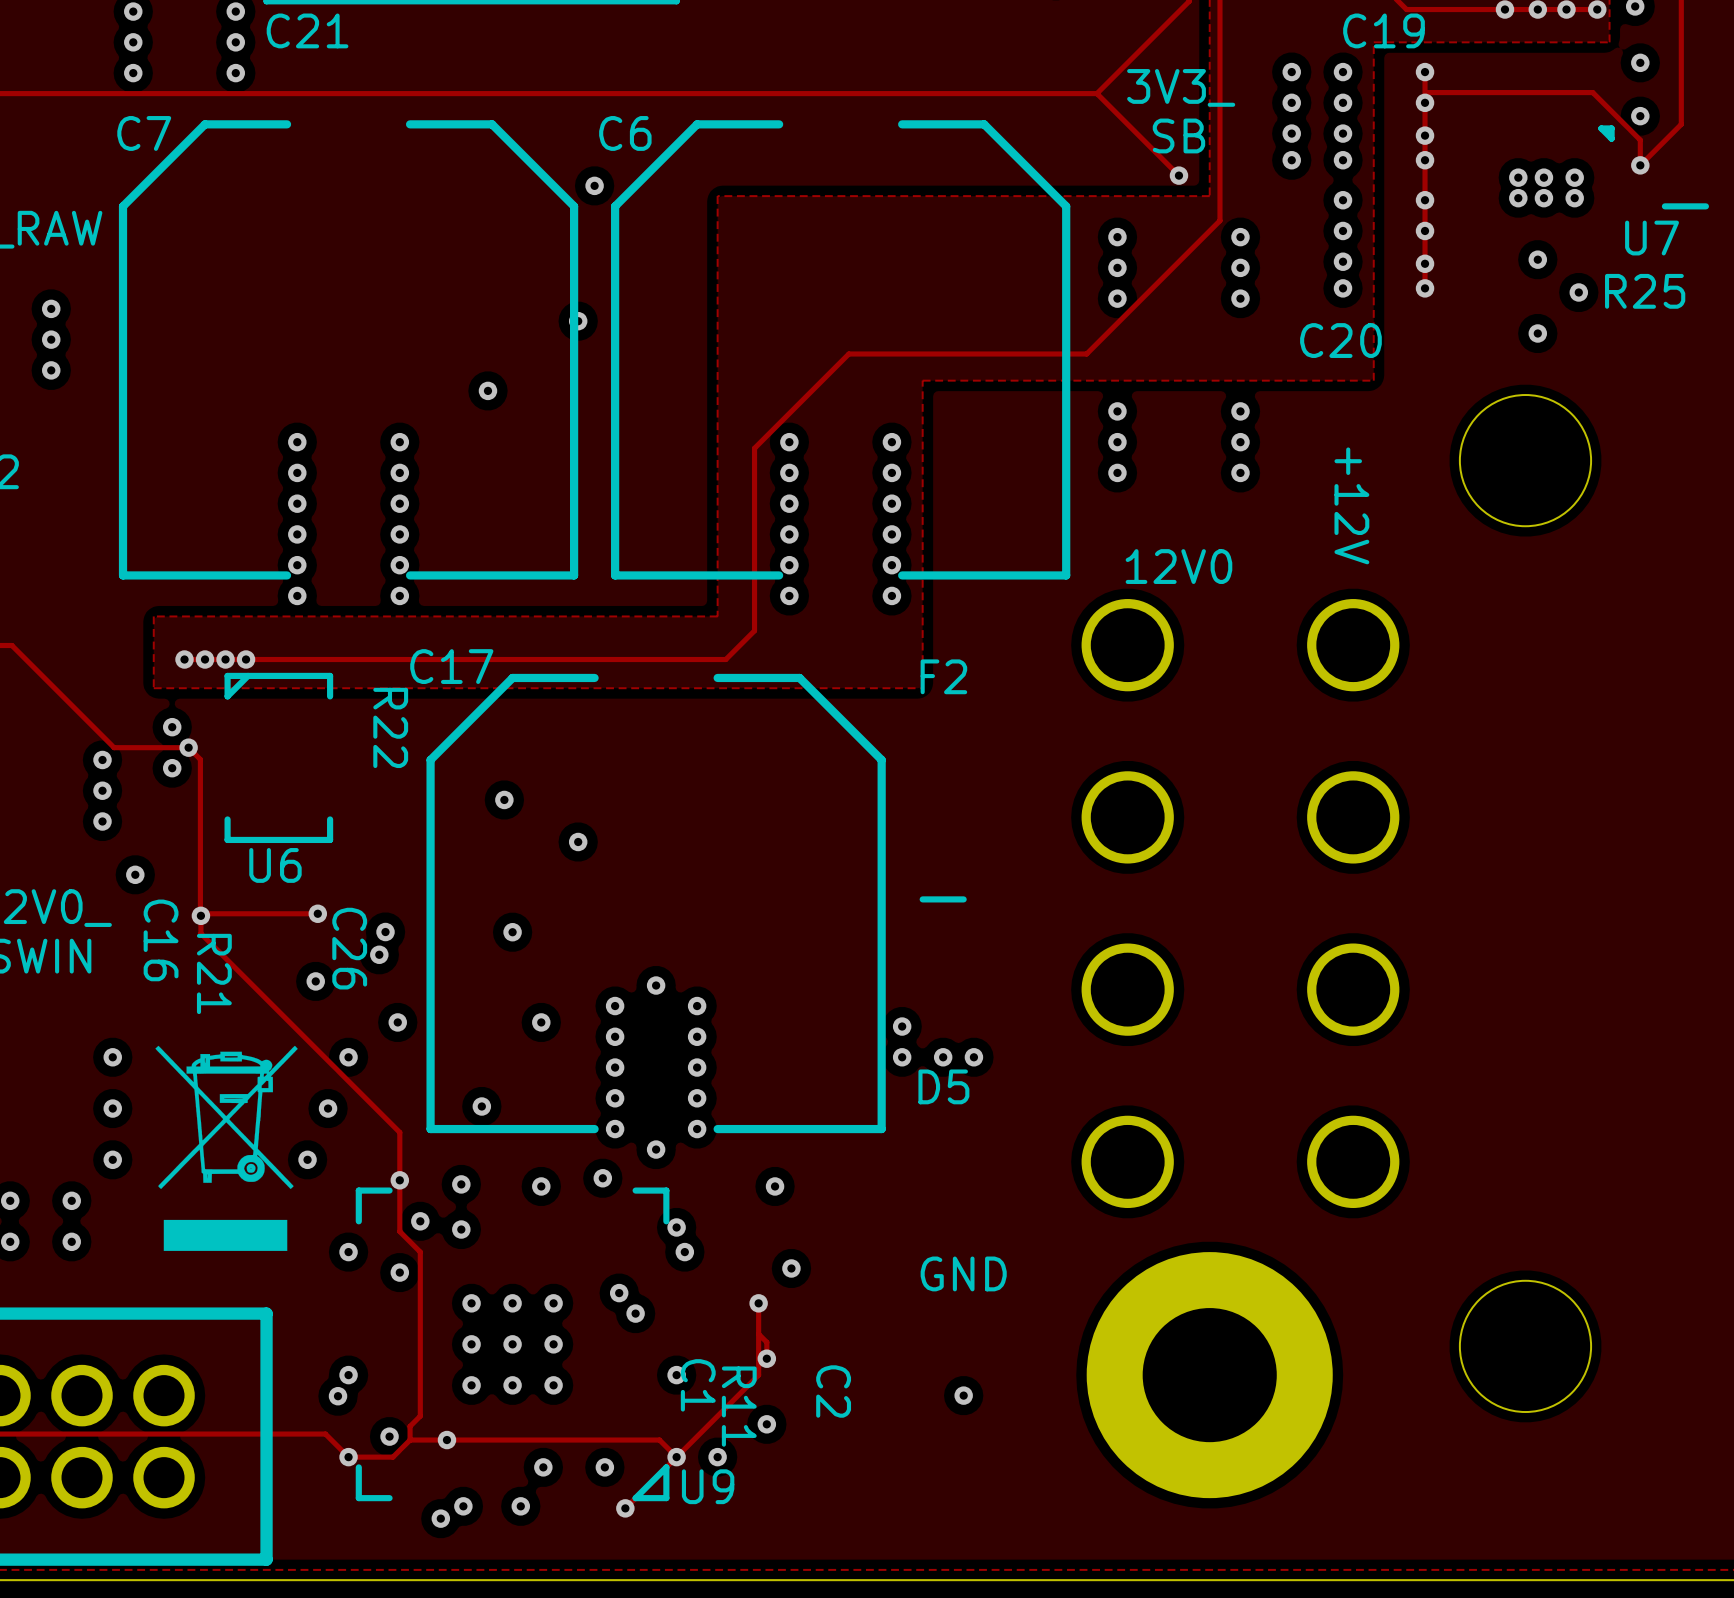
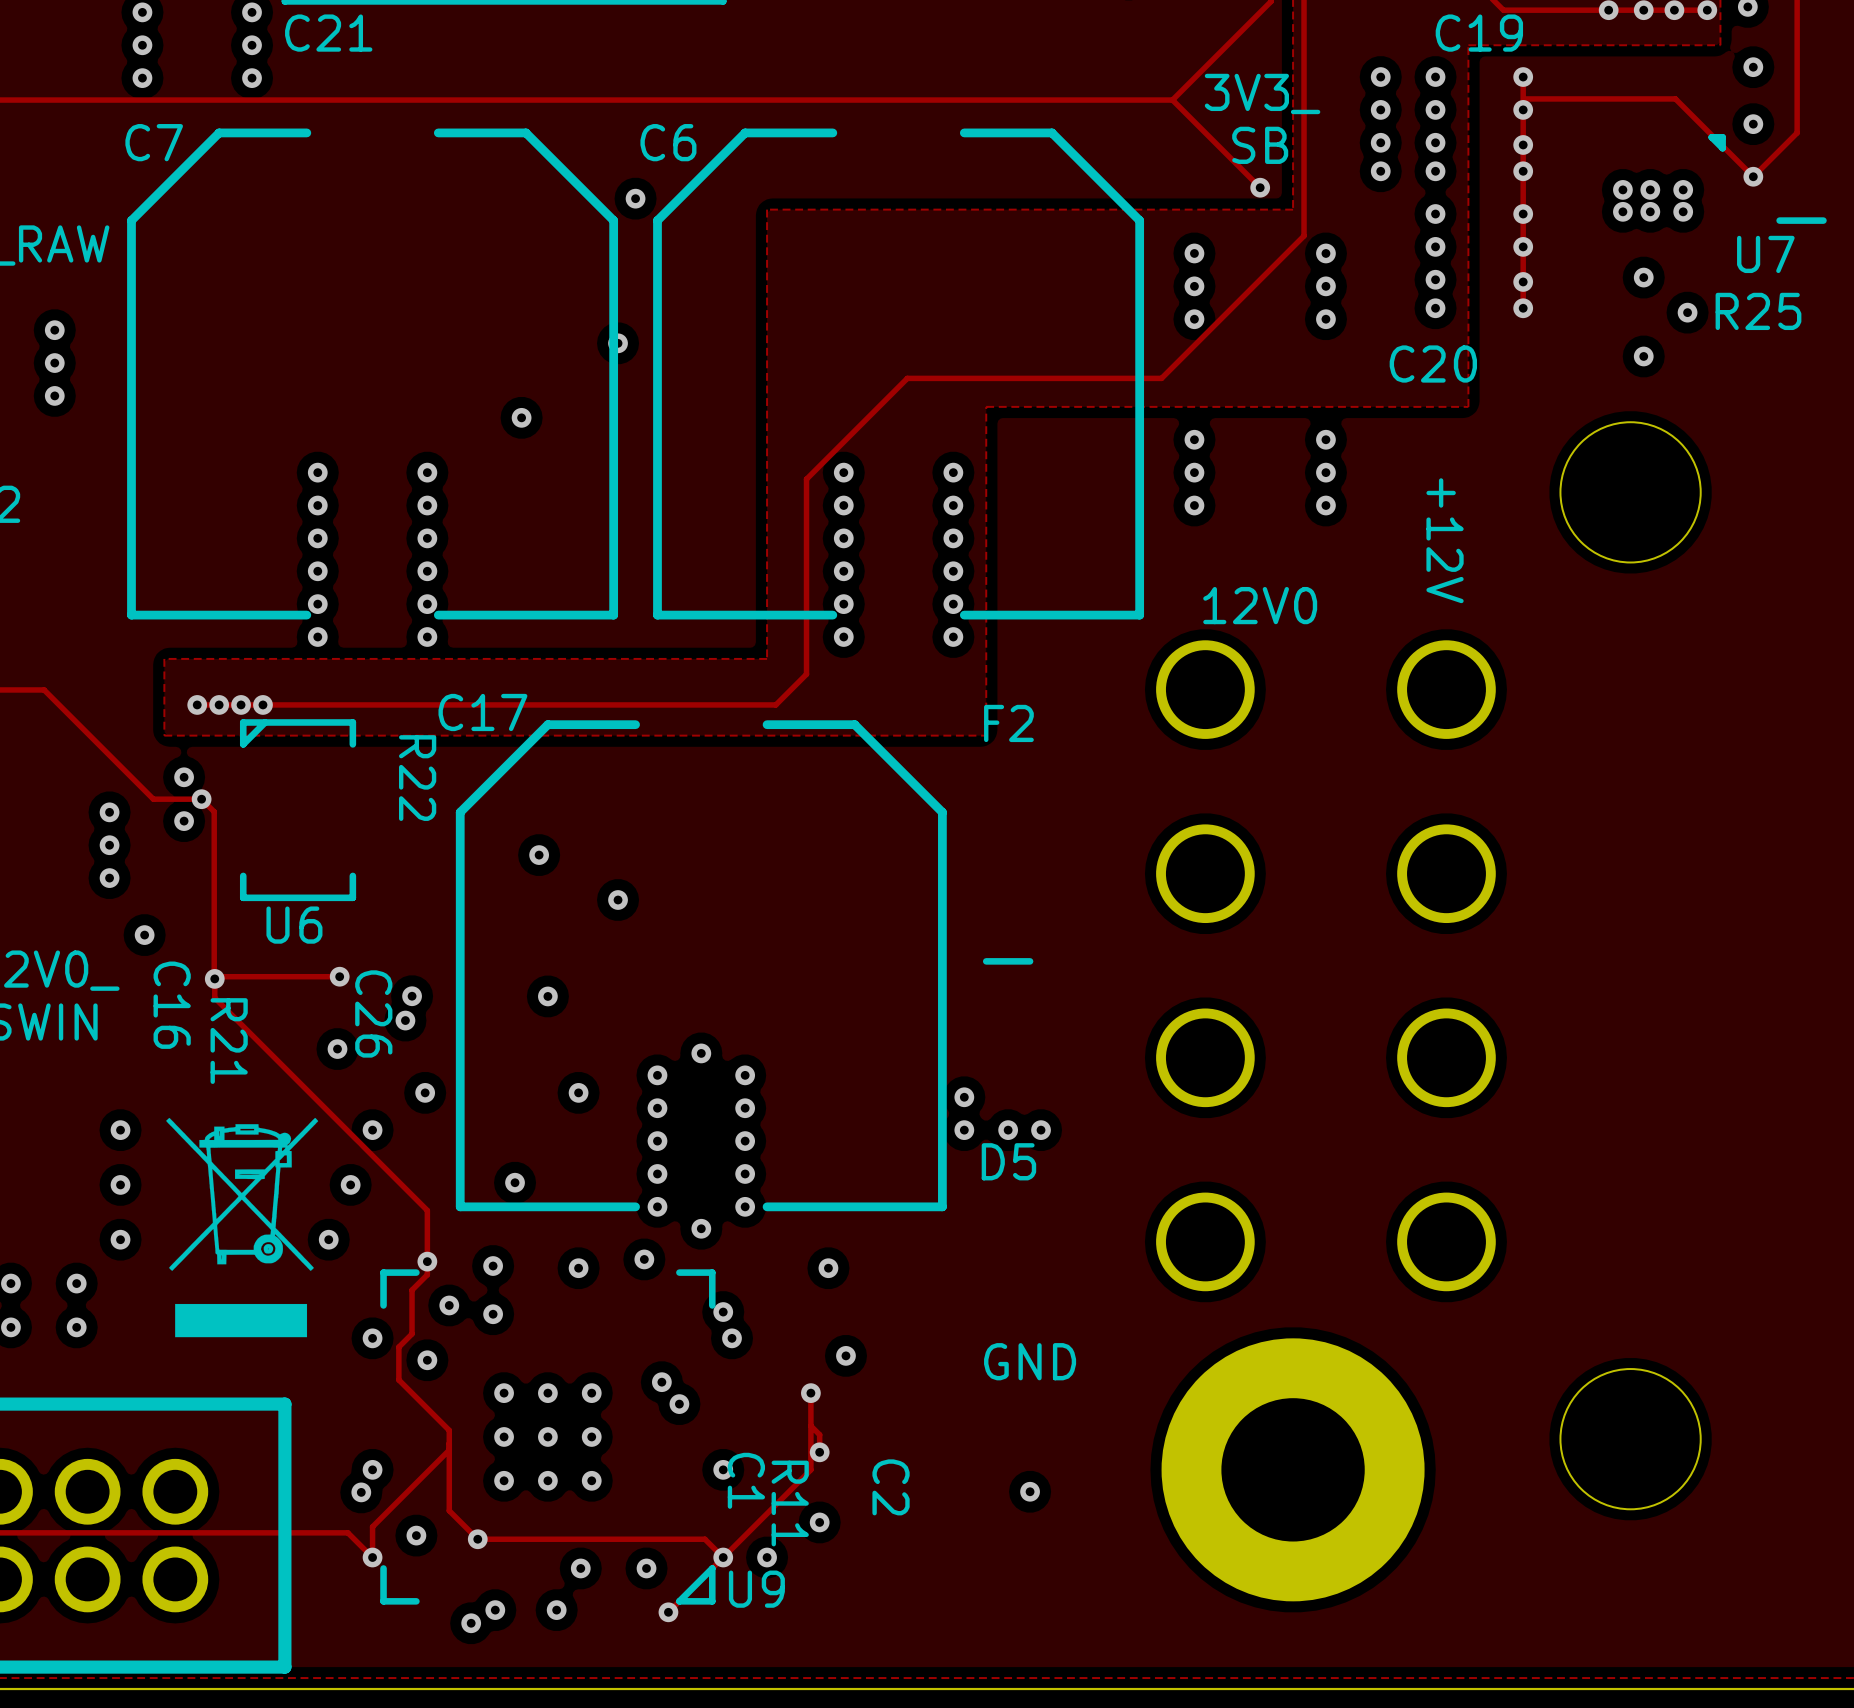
track: (1567, 92) (1592, 92) (1640, 140) (1640, 165) -> (1675, 98) (1753, 176)
track: (11, 645) (114, 747) (143, 747) -> (12, 689) (44, 689) (153, 799)
track: (399, 1192) (399, 1231) (420, 1252) (420, 1338) -> (427, 1274) (412, 1290) (412, 1333) (398, 1347) (398, 1379) (449, 1430)
track: (420, 1413) (420, 1416) (410, 1426) (410, 1440) -> none
track: (410, 1440) (446, 1440) -> (449, 1510) (477, 1539)
track: (410, 1440) (392, 1457) (348, 1457) -> (449, 1450) (372, 1526) (372, 1557)

